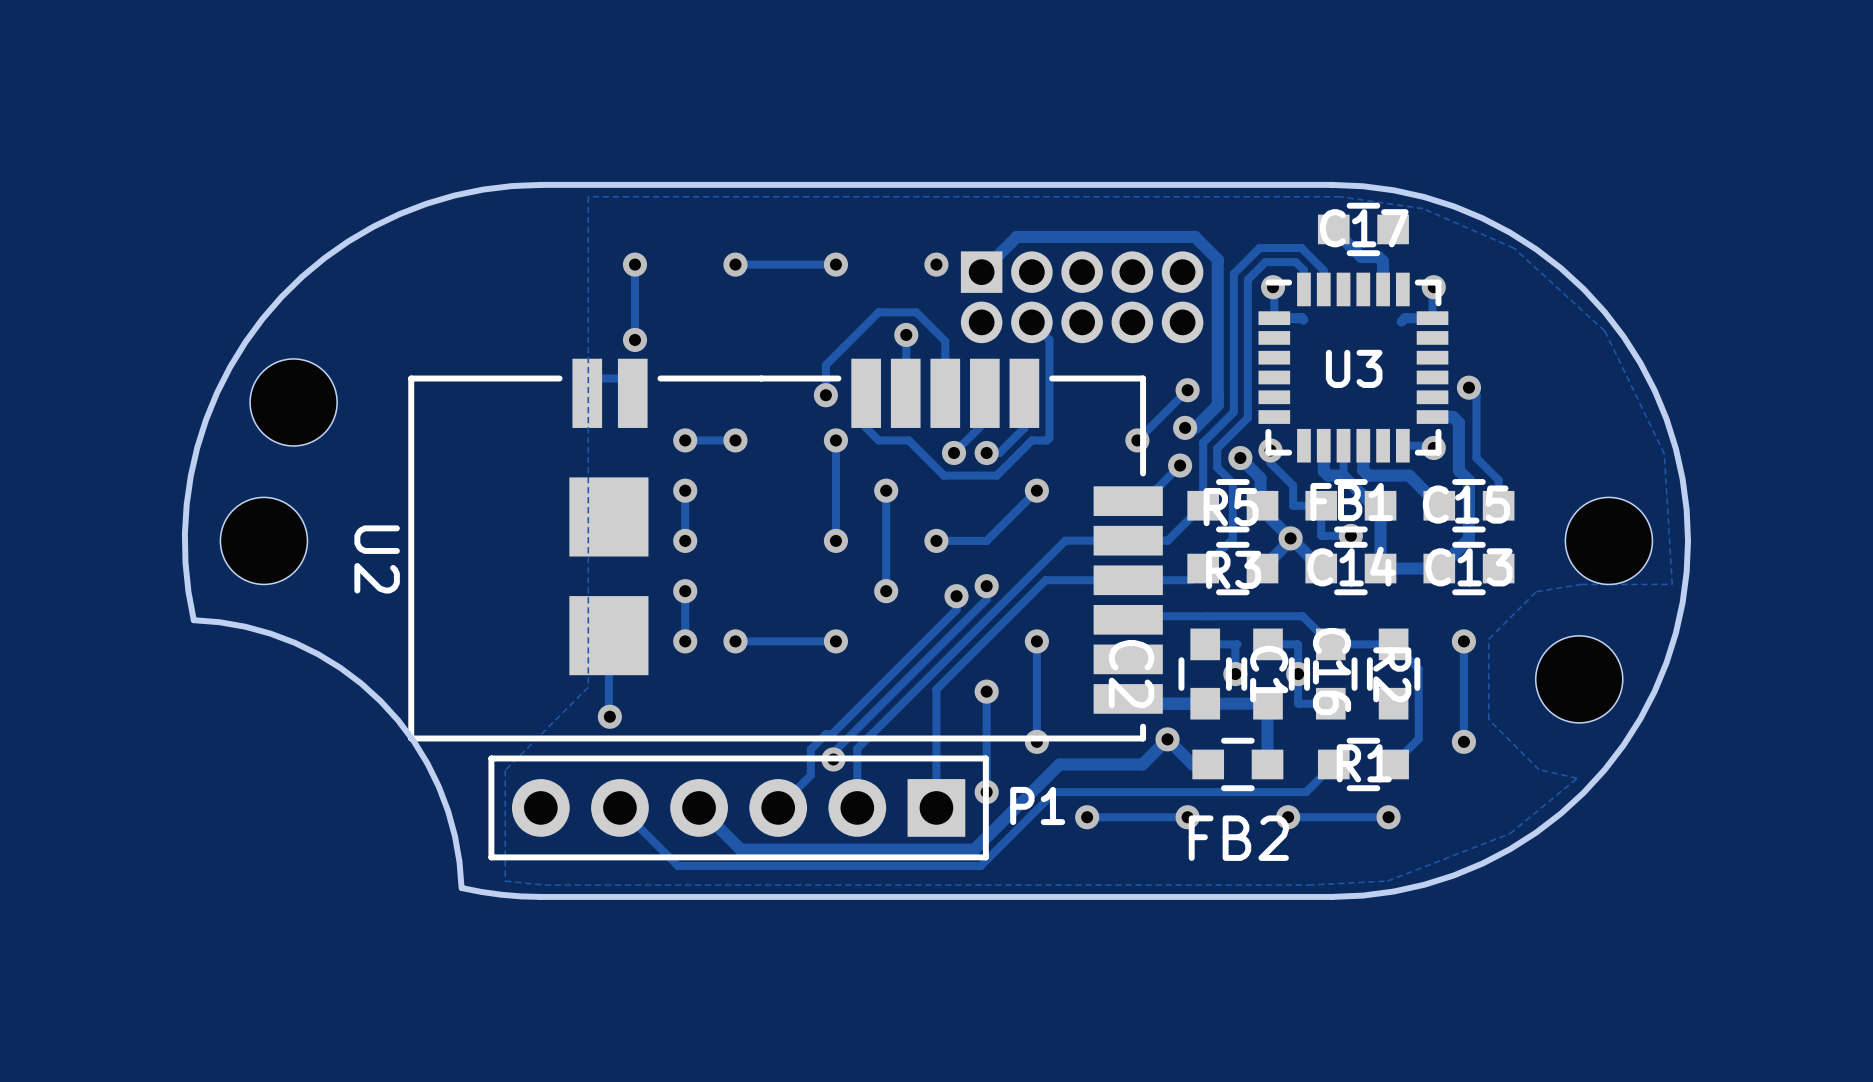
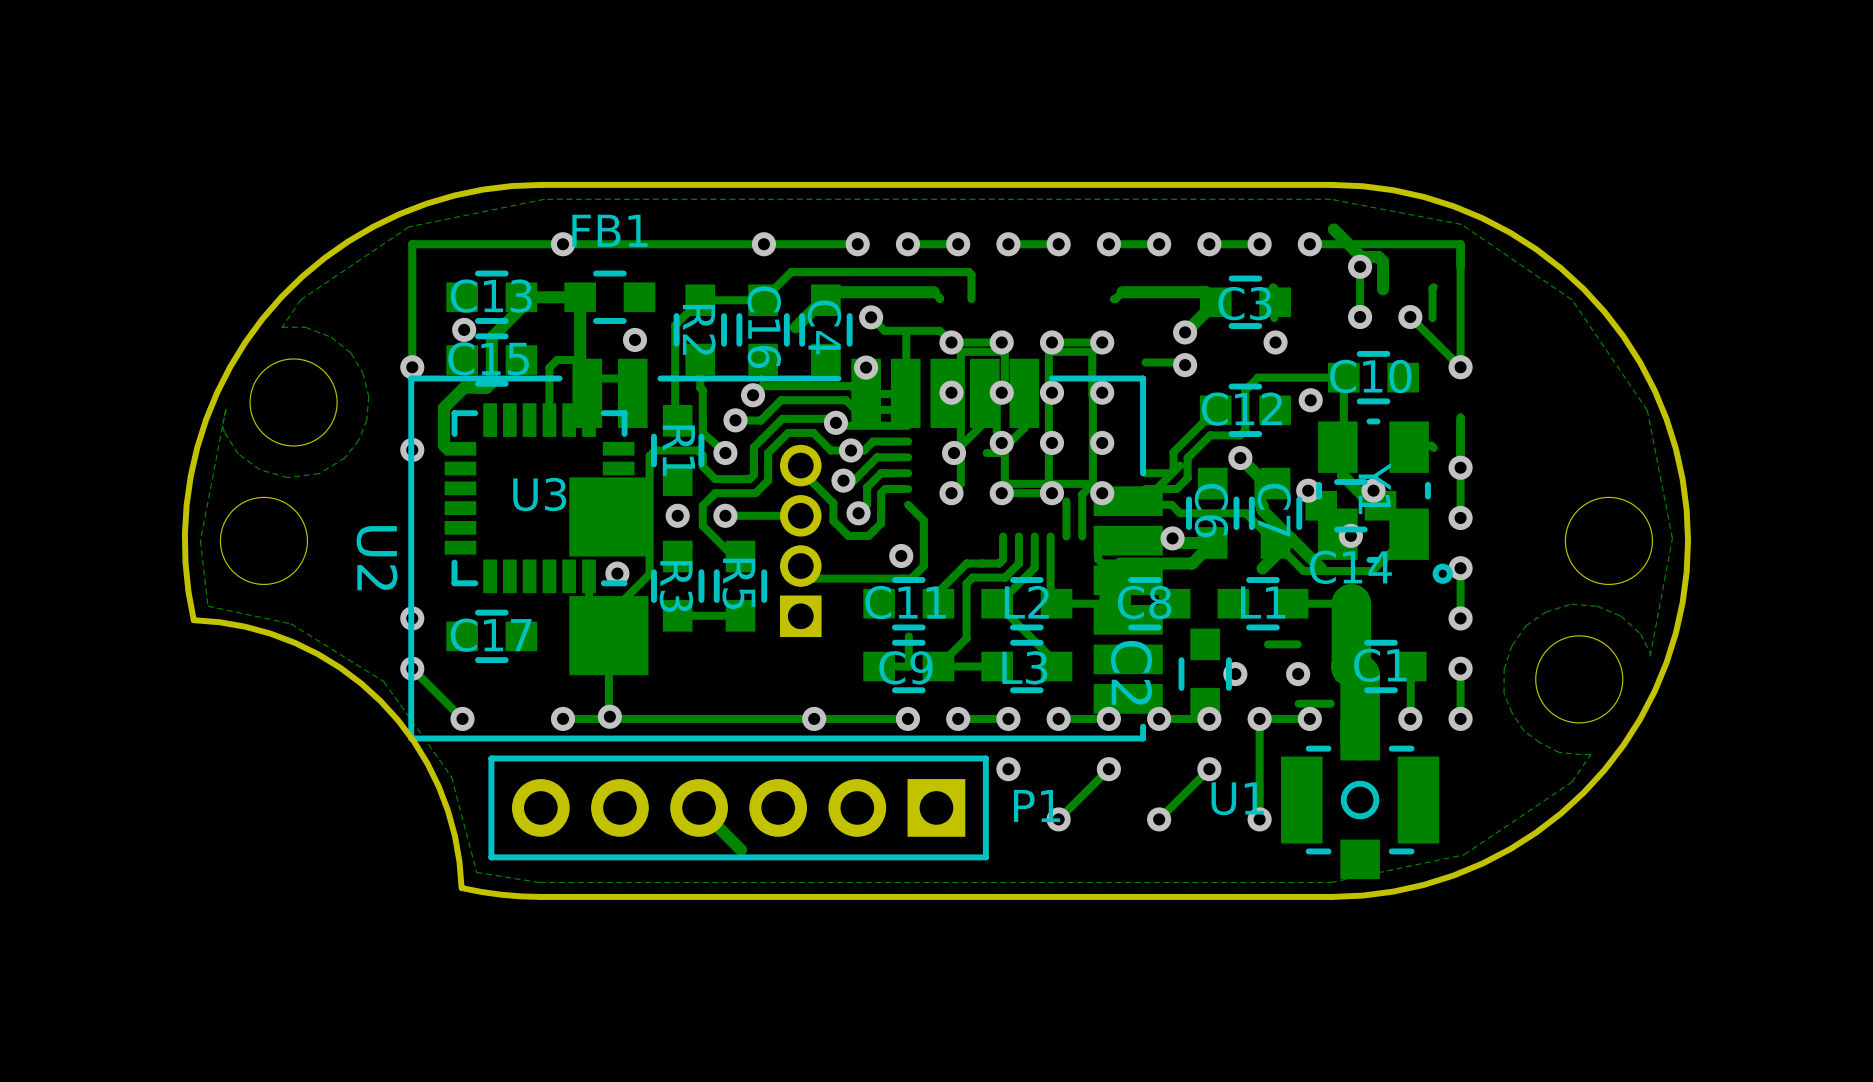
zone outline: (1339, 196) (1423, 208) (1513, 248) (1604, 331) (1664, 453) (1672, 584) (1581, 584) (1536, 591) (1488, 639) (1488, 719) (1539, 769) (1577, 778) (1510, 833) (1387, 881) (1308, 885) (544, 885) (505, 881) (505, 770) (588, 687) (588, 196) (1339, 196) -> (1330, 199) (1461, 224) (1571, 299) (1647, 410) (1672, 538) (1650, 656) (1640, 633) (1620, 616) (1597, 606) (1571, 604) (1545, 612) (1525, 625) (1512, 645) (1504, 669) (1504, 693) (1512, 713) (1523, 730) (1539, 742) (1559, 752) (1590, 754) (1571, 782) (1463, 854) (1330, 882) (539, 882) (476, 872) (451, 777) (383, 681) (290, 623) (207, 606) (200, 540) (222, 426) (238, 453) (259, 469) (287, 477) (319, 473) (345, 457) (358, 440) (366, 420) (368, 396) (362, 372) (350, 353) (331, 337) (305, 327) (282, 327) (300, 299) (408, 226) (544, 199) (1330, 199)
C17 position: (1363, 229) -> (491, 636)
via: none -> (563, 244)
track: none -> (857, 244) (412, 244) (412, 367)
via: none -> (907, 244)
track: none -> (958, 244) (907, 244)
via: none -> (1008, 244)
track: none -> (1058, 244) (1008, 244)
via: none -> (1058, 244)
via: none -> (1108, 244)
track: none -> (1159, 244) (1108, 244)
via: none -> (1159, 244)
via: none -> (1209, 244)
track: none -> (1259, 244) (1209, 244)
via: none -> (1259, 244)
track: none -> (1309, 244) (1460, 244) (1460, 367) (1410, 317)
via: none -> (1309, 244)
track: (634, 264) (634, 339) -> none
via: (634, 264) -> none
via position: (735, 264) -> (763, 244)
track: (835, 264) (735, 264) -> none
via position: (835, 264) -> (857, 244)
via position: (936, 264) -> (958, 244)
track: none -> (1360, 266) (1360, 317)
via: none -> (1360, 266)
track: (981, 272) (1016, 236) (1195, 236) (1217, 259) (1217, 405) (1195, 427) (1185, 427) -> none
via: (1273, 287) -> none
via: (1433, 287) -> none
track: (1303, 289) (1303, 270) (1295, 262) (1265, 262) (1247, 279) (1247, 417) (1217, 448) (1217, 467) (1232, 483) (1232, 538) (1203, 568) -> none
track: (1323, 289) (1323, 270) (1301, 248) (1259, 248) (1233, 273) (1233, 411) (1210, 435) -> (1337, 447) (1343, 441) (1343, 377) (1257, 377) (1245, 390) (1245, 430) (1240, 435) (1210, 435)
part: (1082, 297) -> none
track: none -> (939, 299) (933, 292) (833, 292) (825, 300) (822, 300) (795, 327)
track: none -> (971, 299) (971, 274) (969, 272) (791, 272) (763, 300) (700, 300) (675, 325) (675, 418) (677, 420)
track: none -> (1113, 299) (1122, 292) (1205, 292) (1215, 302) (1185, 332)
C3: none -> (1245, 302)
track: none -> (871, 317) (884, 330) (939, 330) (960, 351)
via: none -> (871, 317)
via: none -> (1360, 317)
via: none -> (1410, 317)
track: (1303, 319) (1274, 318) (1276, 319) -> none
track: (1430, 319) (1432, 318) (1405, 318) (1401, 321) -> none
track: (1031, 322) (1049, 339) (1049, 437) (1046, 440) (1031, 440) (996, 475) (943, 475) (908, 440) (878, 440) (866, 427) (866, 378) -> none
via: none -> (464, 329)
C4: none -> (825, 329)
via: none -> (1185, 332)
via: (906, 334) -> none
via: none -> (951, 342)
via: none -> (1001, 342)
via: none -> (1051, 342)
track: none -> (1102, 342) (1051, 342)
via: none -> (1102, 342)
via: none -> (1275, 342)
track: none -> (960, 351) (1004, 351) (1004, 395) (996, 403) (996, 431)
track: none -> (960, 351) (960, 483) (951, 493)
track: none -> (700, 359) (702, 432) (725, 453)
track: none -> (1145, 362) (1182, 362) (1185, 365)
via: none -> (412, 367)
via: none -> (866, 367)
U3 rotation: 0° (1353, 367) -> 180° (539, 498)
U3 position: (1353, 367) -> (539, 498)
C10: none -> (1373, 377)
track: (945, 378) (945, 341) (916, 312) (878, 312) (825, 365) (825, 395) -> none
track: (1468, 387) (1476, 395) (1476, 458) (1498, 480) (1498, 505) -> none
via position: (1468, 387) -> (1460, 367)
track: (1187, 390) (1137, 440) -> (1209, 769) (1159, 819)
via position: (1187, 390) -> (1185, 365)
via: none -> (951, 392)
via: none -> (1001, 392)
via: none -> (1051, 392)
via: none -> (1102, 392)
track: none -> (908, 394) (859, 394) (851, 386) (762, 386) (753, 395)
via: none -> (753, 395)
via: (825, 395) -> none
track: none -> (1092, 395) (1092, 351) (1048, 351) (1048, 483)
track: none -> (1092, 395) (1092, 483)
via: none -> (1310, 400)
zone outline: none -> (226, 409) (225, 410) (223, 423) (226, 409)
track: none -> (908, 409) (855, 409) (846, 400) (781, 400) (760, 420) (735, 420)
track: none -> (1215, 410) (1173, 452) (1173, 470) (1170, 473) (1145, 473)
C12: none -> (1245, 410)
track: (1432, 417) (1453, 417) (1458, 422) (1458, 470) (1468, 480) (1468, 538) (1439, 568) (1380, 568) (1380, 505) (1379, 504) -> none
via: none -> (735, 420)
track: none -> (549, 421) (549, 367) (557, 360) (580, 360) (580, 297) (521, 297) (521, 307) (491, 337) (491, 382) (486, 387) (464, 387) (444, 407) (444, 445) (447, 448) (462, 448)
via: none -> (835, 422)
track: none -> (908, 425) (838, 425) (831, 418) (782, 418) (754, 447) (754, 474) (749, 479) (715, 479) (702, 466) (702, 455) (697, 450) (655, 450) (649, 455) (649, 574) (620, 603) (592, 603) (588, 600) (588, 575)
via: (1185, 427) -> none
track: none -> (1004, 439) (1004, 483) (1092, 483)
via: (685, 440) -> none
track: (735, 440) (685, 440) -> (1001, 342) (951, 342)
via: (735, 440) -> none
track: (835, 440) (835, 540) -> none
via: (835, 440) -> none
via: (1137, 440) -> none
track: none -> (908, 441) (873, 441) (864, 450) (830, 450) (813, 432) (788, 432) (768, 453) (768, 480) (755, 493) (715, 493) (702, 505) (702, 525) (733, 556) (740, 556) (740, 553)
via: none -> (1051, 442)
via: none -> (1102, 442)
track: (1203, 442) (1203, 505) -> (1203, 442) (1187, 458) (1187, 478) (1176, 489) (1145, 489)
track: (1323, 445) (1323, 471) (1328, 475) (1342, 475) -> none
track: (1363, 445) (1363, 470) (1368, 475) (1409, 475) (1439, 505) -> none
via position: (1433, 447) -> (1460, 467)
via: none -> (412, 449)
via: none -> (851, 450)
track: (1270, 450) (1270, 463) (1293, 485) (1293, 505) (1321, 505) (1321, 535) -> none
via: (1270, 450) -> none
via: none -> (725, 453)
via position: (986, 453) -> (1001, 442)
track: none -> (908, 457) (877, 457) (853, 480) (843, 480)
track: none -> (800, 465) (800, 470) (833, 503) (833, 520) (848, 535) (868, 535) (881, 523) (881, 493) (885, 489) (908, 489)
via: (1180, 465) -> none
track: none -> (908, 473) (881, 473) (867, 487) (867, 504) (858, 513) (858, 505)
via: none -> (843, 480)
track: none -> (1092, 483) (1082, 494) (1082, 536)
track: (685, 490) (685, 540) -> (1460, 568) (1460, 618)
via: (685, 490) -> none
track: (886, 490) (886, 591) -> none
via: (886, 490) -> none
track: (1036, 490) (986, 540) (936, 540) -> none
via position: (1036, 490) -> (1051, 493)
via: none -> (1308, 490)
via: none -> (1373, 490)
via: none -> (951, 493)
via: none -> (1001, 493)
track: none -> (1051, 493) (1001, 493)
via: none -> (1102, 493)
track: none -> (1066, 501) (1066, 536)
Y1: none -> (1384, 501)
track: none -> (908, 504) (923, 520) (923, 566) (911, 578) (813, 578) (800, 566)
track: none -> (1145, 504) (1171, 504) (1180, 513) (1245, 513) (1303, 571) (1372, 571) (1409, 534)
track: none -> (790, 505) (800, 515) (725, 515)
track: (1203, 505) (1167, 540) (1065, 540) (857, 748) (857, 807) -> none
R5 rotation: 0° (1232, 505) -> 90° clockwise (740, 586)
R5 position: (1232, 505) -> (740, 586)
C15 position: (1468, 505) -> (491, 360)
via: none -> (858, 513)
C6: none -> (1212, 513)
C7: none -> (1275, 513)
via: none -> (677, 515)
via: none -> (725, 515)
via: none -> (1460, 517)
track: (1350, 535) (1321, 535) -> none
track: none -> (1003, 536) (1003, 559) (999, 563) (966, 563) (938, 591) (938, 603)
track: none -> (1018, 536) (1018, 563) (1005, 577) (972, 577) (966, 583) (966, 638) (938, 666) (997, 666)
track: none -> (1034, 536) (1034, 567) (997, 603) (1056, 663) (1056, 666)
track: none -> (1050, 536) (1050, 597) (1056, 603) (1115, 603)
track: none -> (1098, 536) (1098, 559) (1102, 563) (1192, 563) (1212, 542) (1177, 542) (1172, 538)
via: none -> (1172, 538)
via: (1290, 538) -> none
via: (685, 540) -> none
part: none -> (800, 540)
via: (835, 540) -> none
via: (936, 540) -> none
via: none -> (901, 555)
R3 rotation: 0° (1232, 568) -> 90° clockwise (677, 586)
R3 position: (1232, 568) -> (677, 586)
FB1 position: (1350, 568) -> (609, 297)
via: none -> (1460, 568)
C13 position: (1468, 568) -> (491, 297)
via: none -> (617, 573)
track: (1191, 580) (1045, 580) (936, 689) (936, 807) -> none
track: (986, 586) (986, 599) (833, 752) (833, 759) -> none
via: (986, 586) -> none
track: (685, 591) (685, 641) -> (1460, 668) (1460, 718)
via: (685, 591) -> none
via: (886, 591) -> none
track: (956, 596) (956, 609) (831, 734) (825, 734) (810, 749) (810, 775) (778, 807) -> none
via: (956, 596) -> none
C11: none -> (908, 603)
L2: none -> (1026, 603)
C8: none -> (1144, 603)
L1: none -> (1262, 603)
track: none -> (1292, 603) (1351, 603) (1351, 666) (1360, 675) (1360, 740)
track: none -> (740, 615) (677, 615)
via: none -> (412, 618)
track: (1144, 621) (1143, 619) (1146, 616) (1302, 616) (1330, 644) (1394, 644) (1418, 669) (1418, 738) (1393, 764) -> none
track: none -> (908, 636) (908, 666) (879, 666)
via: (685, 641) -> none
via: (735, 641) -> none
track: (835, 641) (735, 641) -> none
via: (835, 641) -> none
track: (1036, 641) (1036, 741) -> none
via: (1036, 641) -> none
track: (1463, 641) (1463, 741) -> (1460, 417) (1460, 517)
via position: (1463, 641) -> (1460, 618)
track: (1205, 644) (1237, 644) (1235, 646) (1235, 674) -> none
track: (1298, 644) (1298, 703) -> none
C9: none -> (908, 666)
L3: none -> (1026, 666)
track: none -> (1410, 666) (1410, 718)
track: none -> (412, 668) (462, 718)
via: none -> (412, 668)
via: none -> (1460, 668)
C1 rotation: 0° (1268, 674) -> 90° clockwise (1381, 666)
C1 position: (1268, 674) -> (1381, 666)
C16 position: (1330, 674) -> (763, 329)
R2 position: (1393, 674) -> (700, 329)
track: (986, 691) (986, 792) -> none
via: (986, 691) -> none
track: (1143, 698) (1147, 703) (1267, 703) -> none
track: (1267, 704) (1267, 764) -> none
via: none -> (462, 718)
via: none -> (563, 718)
via: none -> (814, 718)
track: none -> (907, 718) (563, 718)
via: none -> (907, 718)
via: none -> (958, 718)
track: none -> (1008, 718) (958, 718)
via: none -> (1008, 718)
track: none -> (1108, 718) (1058, 718)
via: none -> (1108, 718)
track: none -> (1209, 718) (1159, 718)
via: none -> (1209, 718)
via: none -> (1259, 718)
track: none -> (1309, 718) (1259, 718) (1259, 819)
via: none -> (1309, 718)
via: none -> (1410, 718)
via position: (1167, 739) -> (1159, 718)
via position: (1036, 741) -> (1058, 718)
via position: (1463, 741) -> (1460, 718)
via: (833, 759) -> none
track: (1208, 764) (1192, 764) (1167, 739) (1142, 764) (1059, 764) (974, 849) (740, 849) -> none
FB2: (1237, 764) -> none
track: (1333, 764) (1306, 792) (1054, 792) (980, 865) (677, 865) (619, 807) -> none
R1 rotation: 0° (1363, 764) -> 90° clockwise (677, 450)
R1 position: (1363, 764) -> (677, 450)
track: none -> (1108, 769) (1058, 819)
via: none -> (1108, 769)
via: none -> (1209, 769)
via position: (986, 792) -> (1008, 769)
U1: none -> (1360, 800)
via: (1087, 817) -> none
track: (1187, 817) (1087, 817) -> none
via: (1187, 817) -> none
via position: (1288, 817) -> (1259, 819)
track: (1388, 817) (1288, 817) -> none
via: (1388, 817) -> none
via: none -> (1058, 819)
via: none -> (1159, 819)

